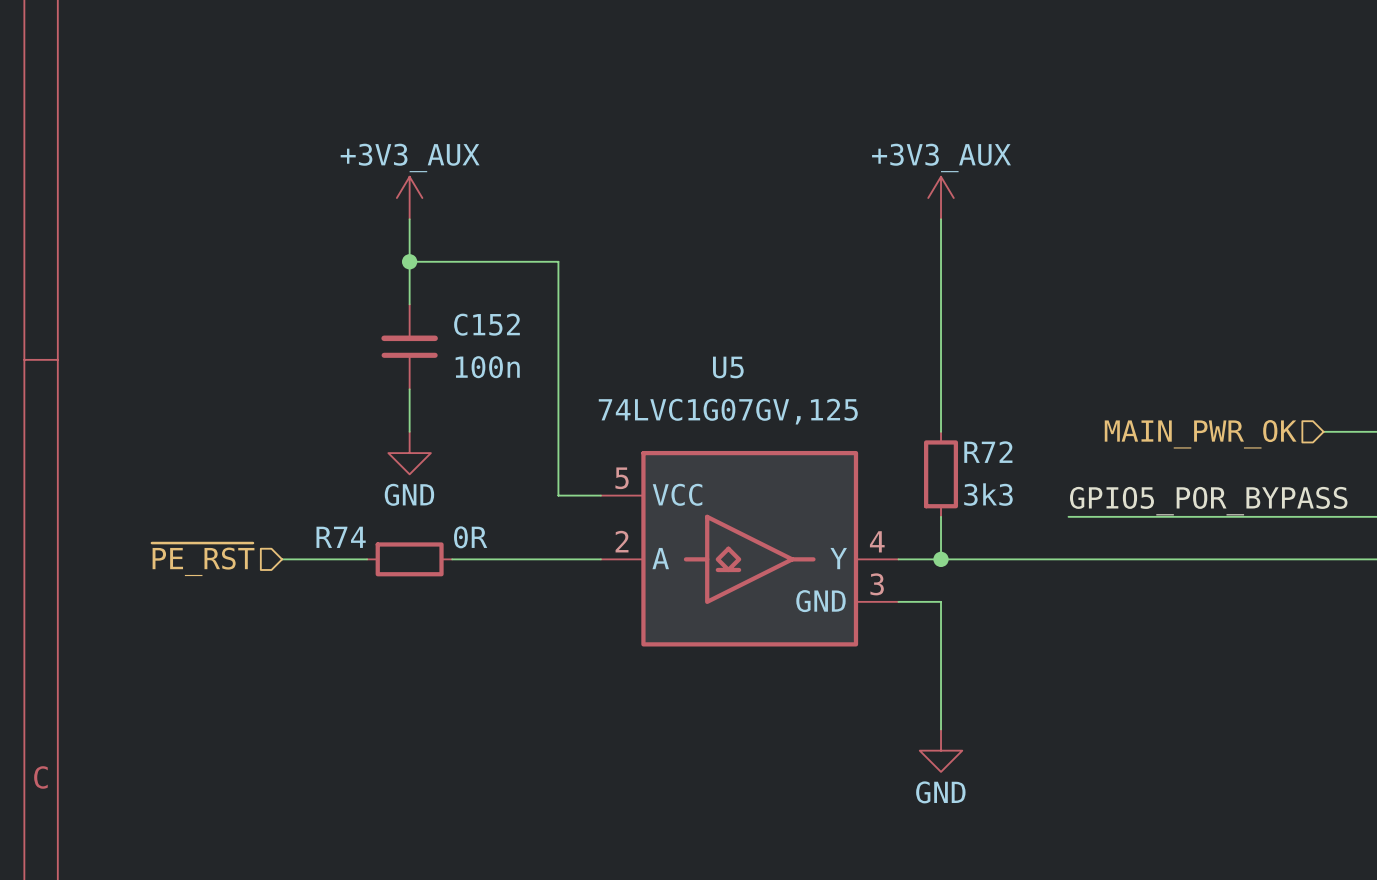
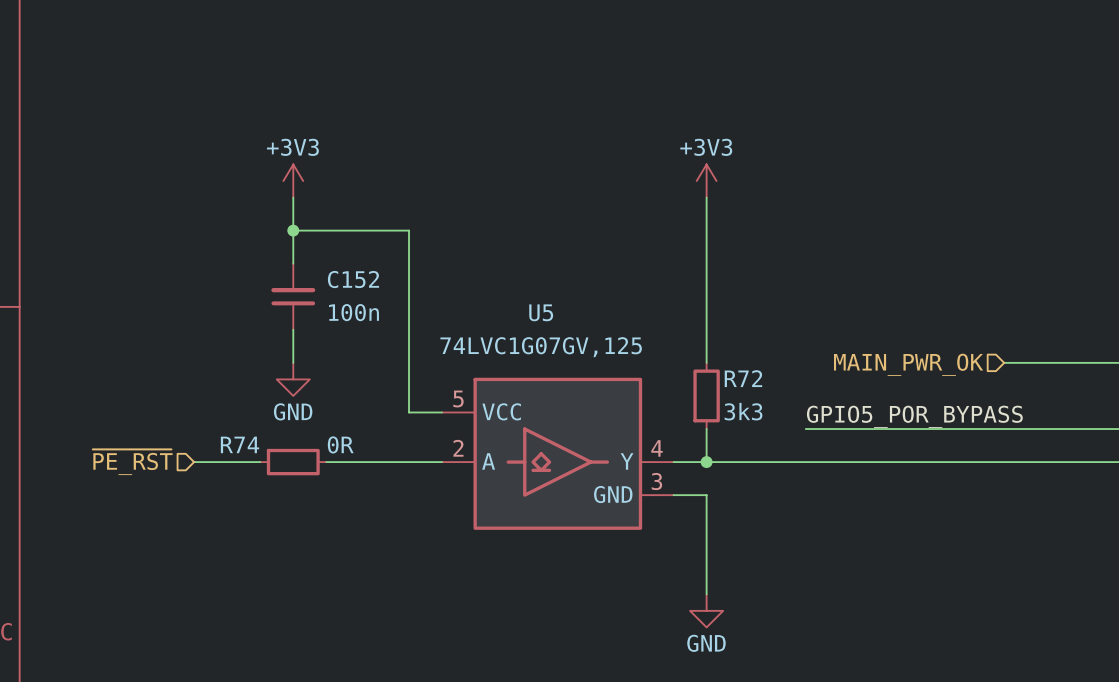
power symbol: +3V3_AUX (409, 198) -> +3V3 (293, 181)
power symbol: +3V3_AUX (941, 198) -> +3V3 (706, 181)

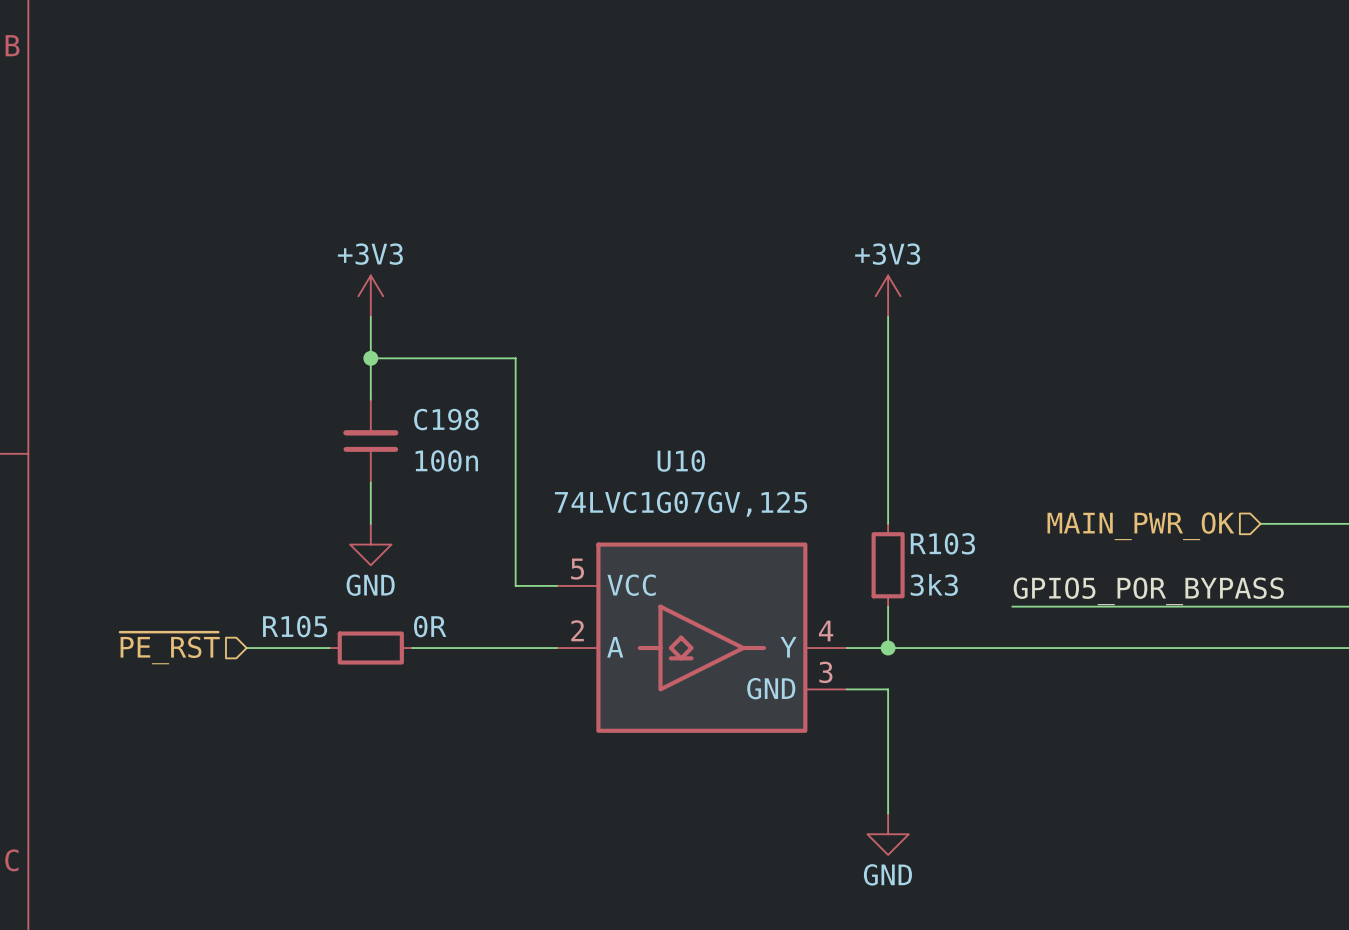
C152 name: C152 (353, 279) -> C198 (446, 419)
U5 name: U5 (541, 312) -> U10 (681, 461)
R72 name: R72 (743, 378) -> R103 (942, 543)
R74 name: R74 (239, 444) -> R105 (295, 626)

